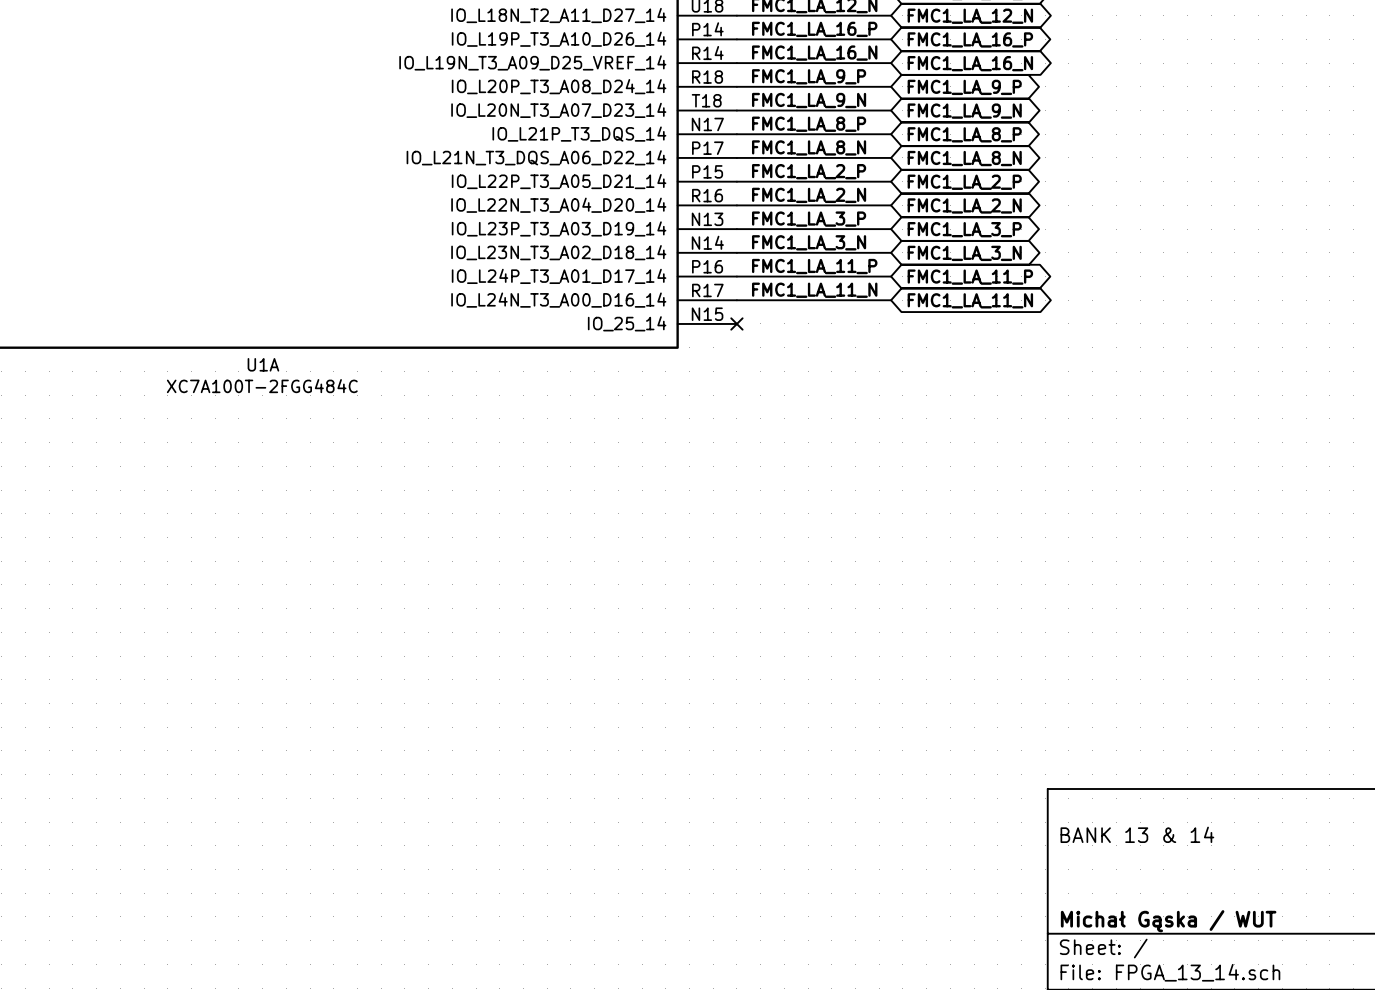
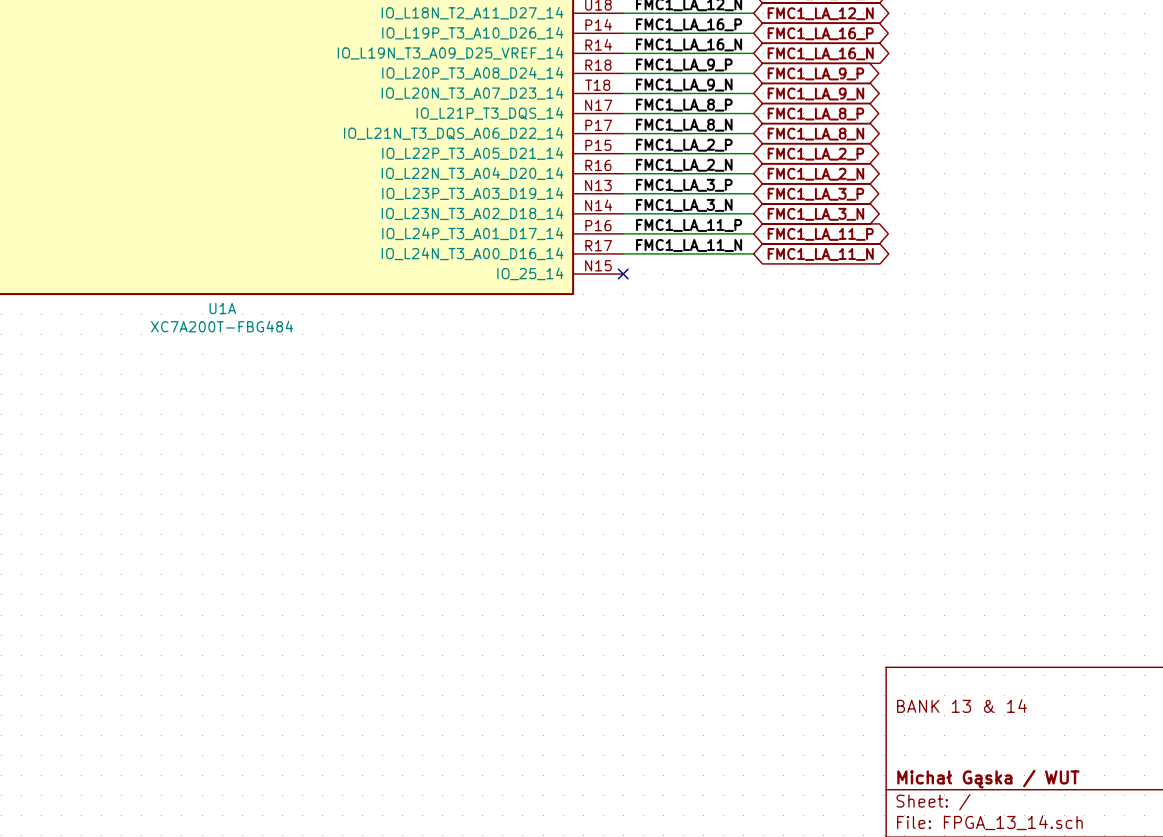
U1A value: XC7A100T-2FGG484C (262, 386) -> XC7A200T-FBG484 (222, 326)

